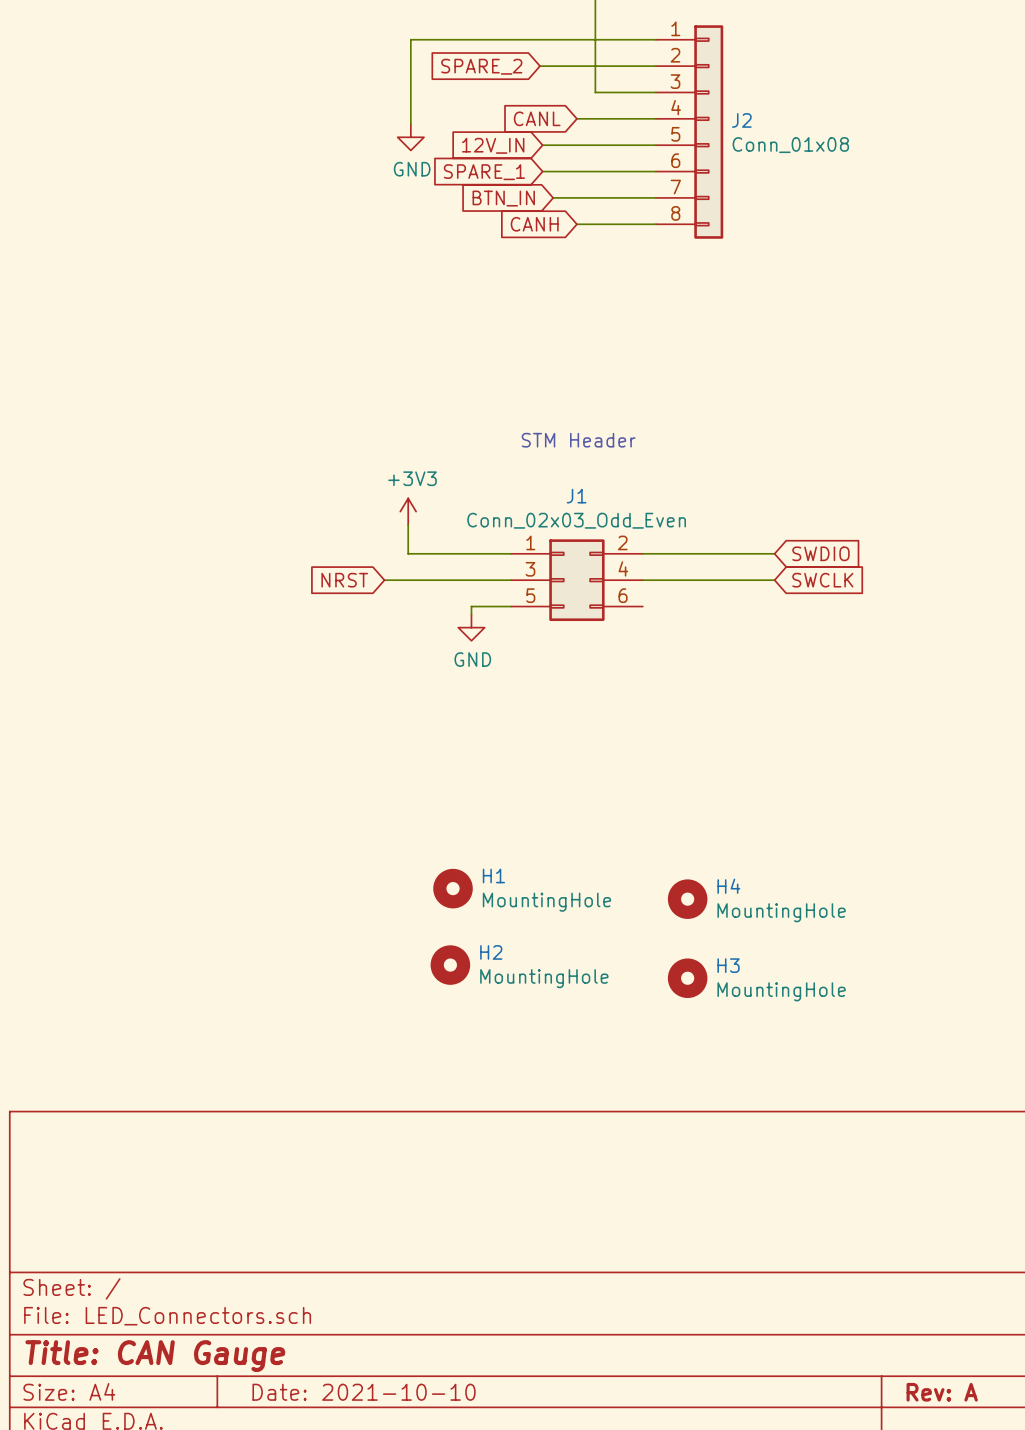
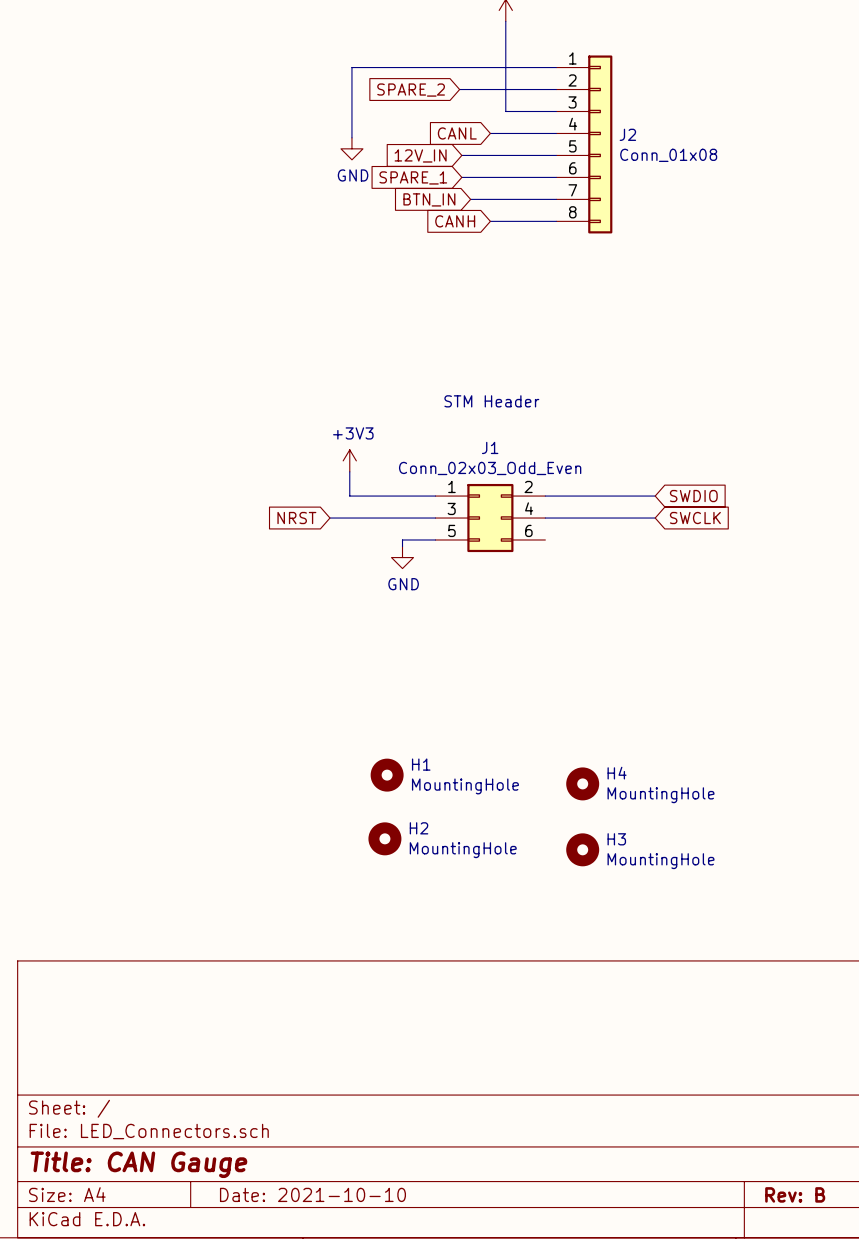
title block: Rev: A (942, 1392) -> Rev: B (795, 1194)

